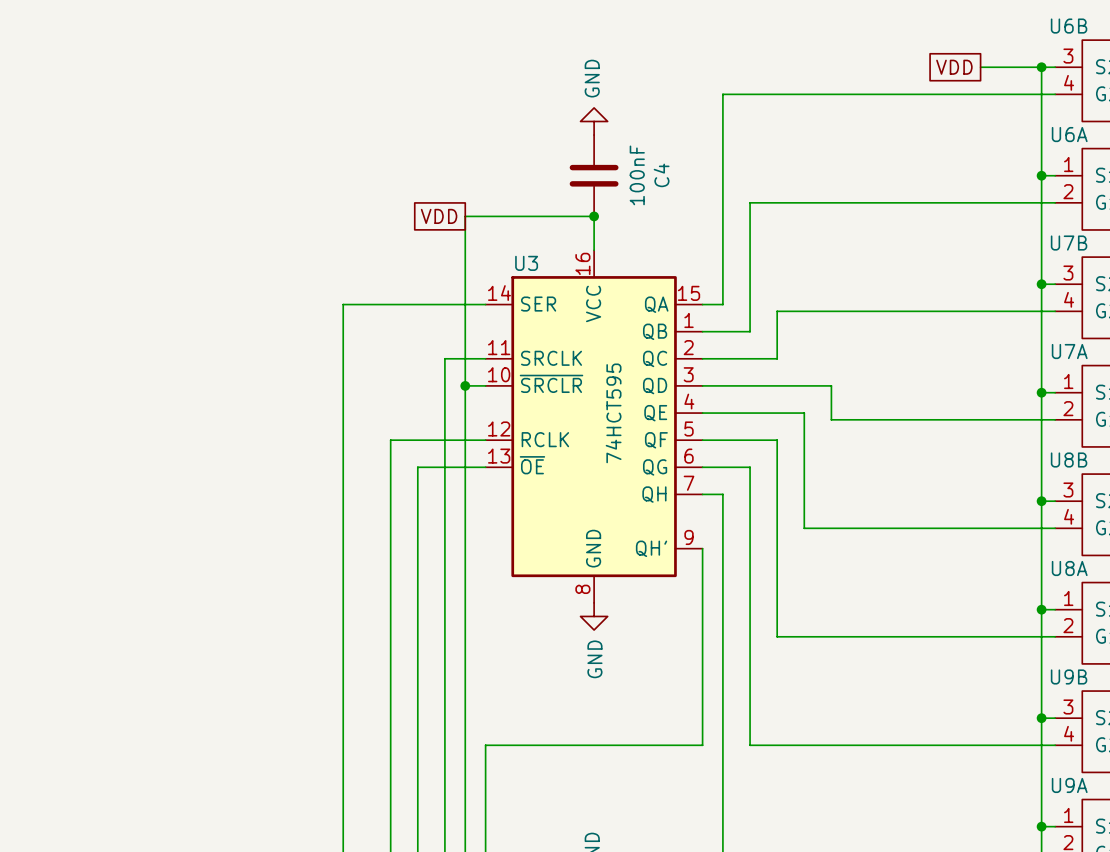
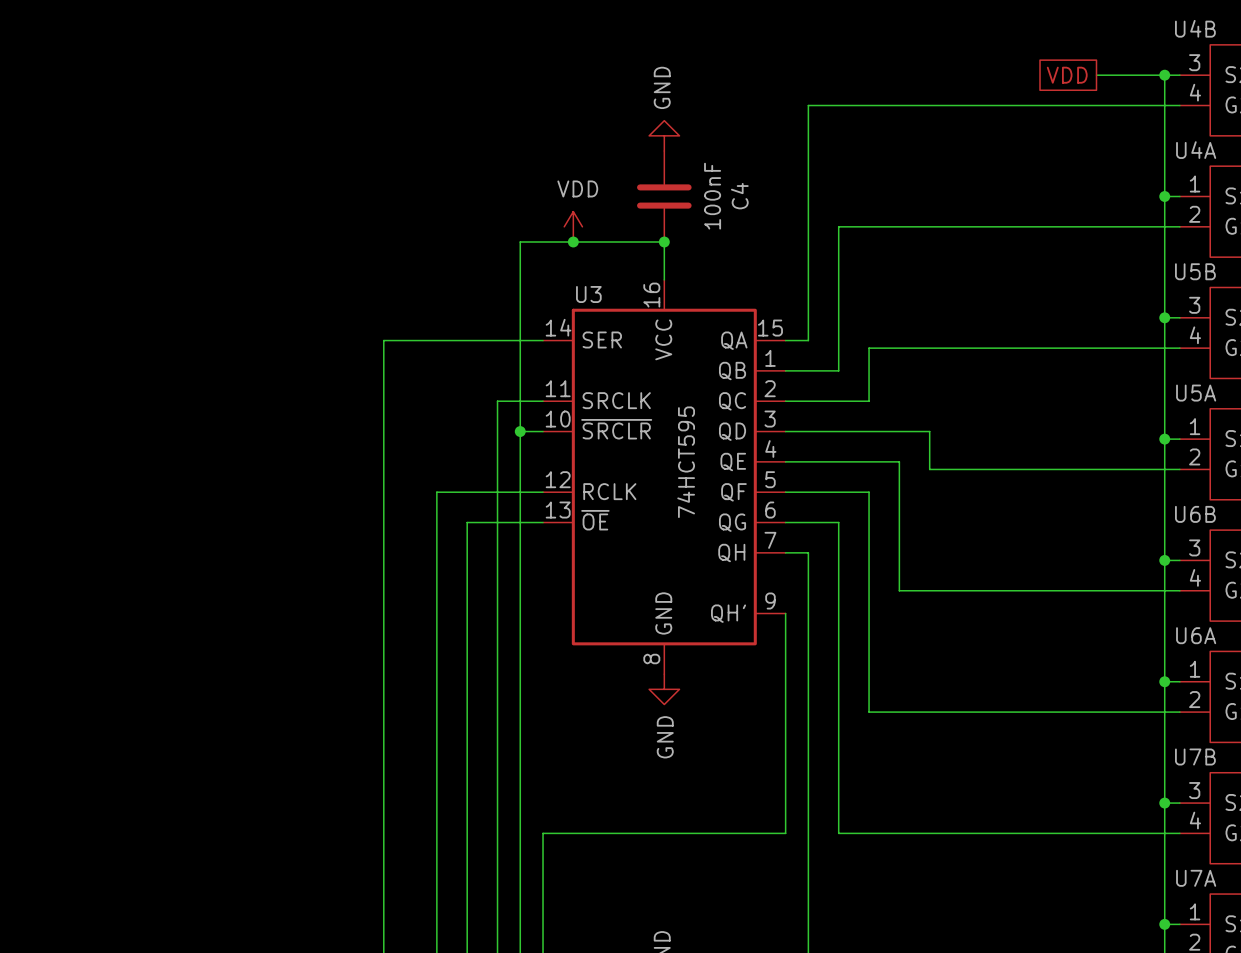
U6B name: U6B (1069, 26) -> U4B (1195, 28)
U6A name: U6A (1069, 134) -> U4A (1196, 150)
power symbol: none -> VDD (573, 226)
global label: VDD (439, 216) -> none
junction: none -> (573, 241)
U7B name: U7B (1069, 243) -> U5B (1195, 271)
U7A name: U7A (1069, 351) -> U5A (1196, 393)
U8B name: U8B (1069, 460) -> U6B (1195, 514)
U8A name: U8A (1069, 568) -> U6A (1196, 635)
U9B name: U9B (1069, 676) -> U7B (1195, 757)
U9A name: U9A (1069, 785) -> U7A (1196, 878)

